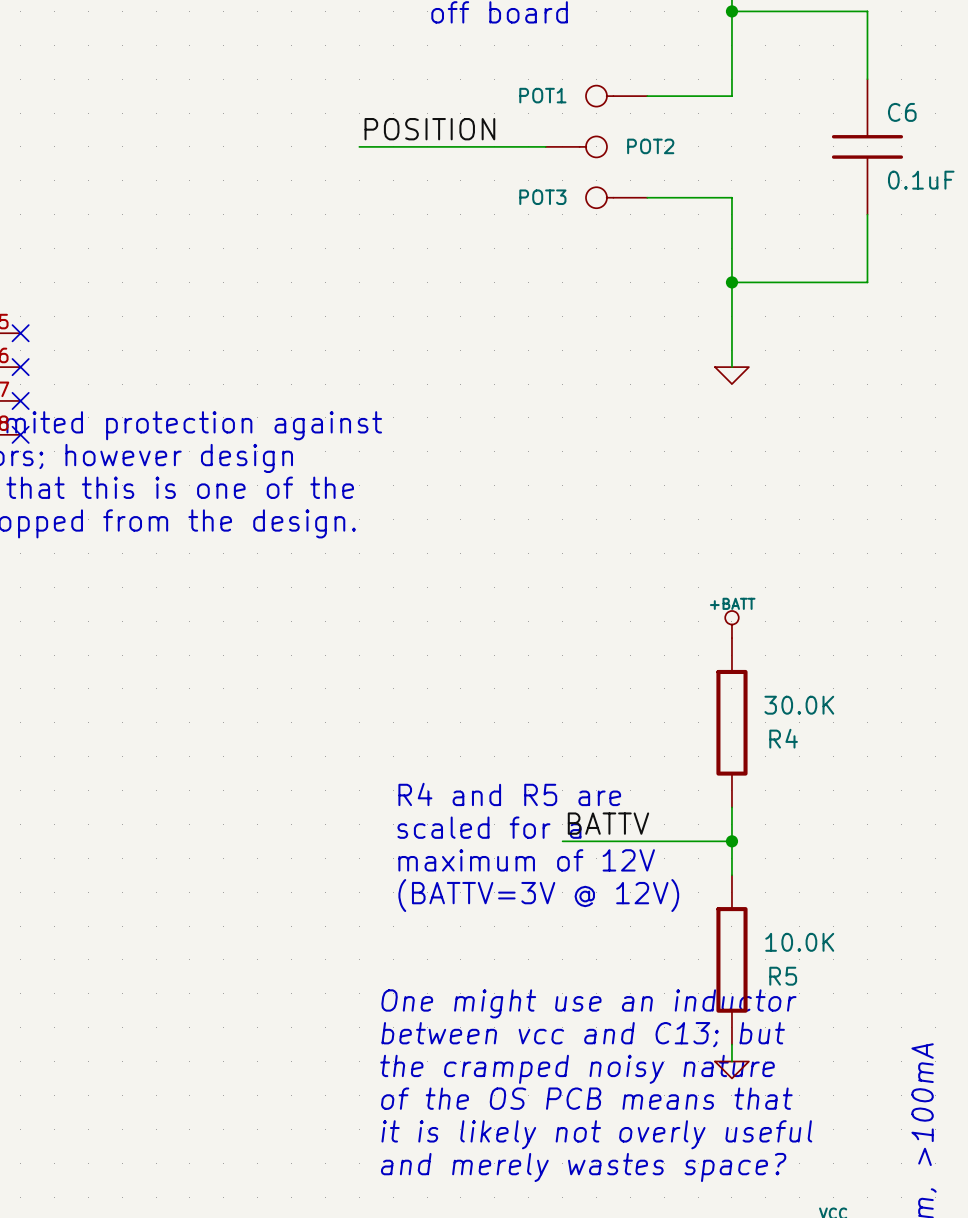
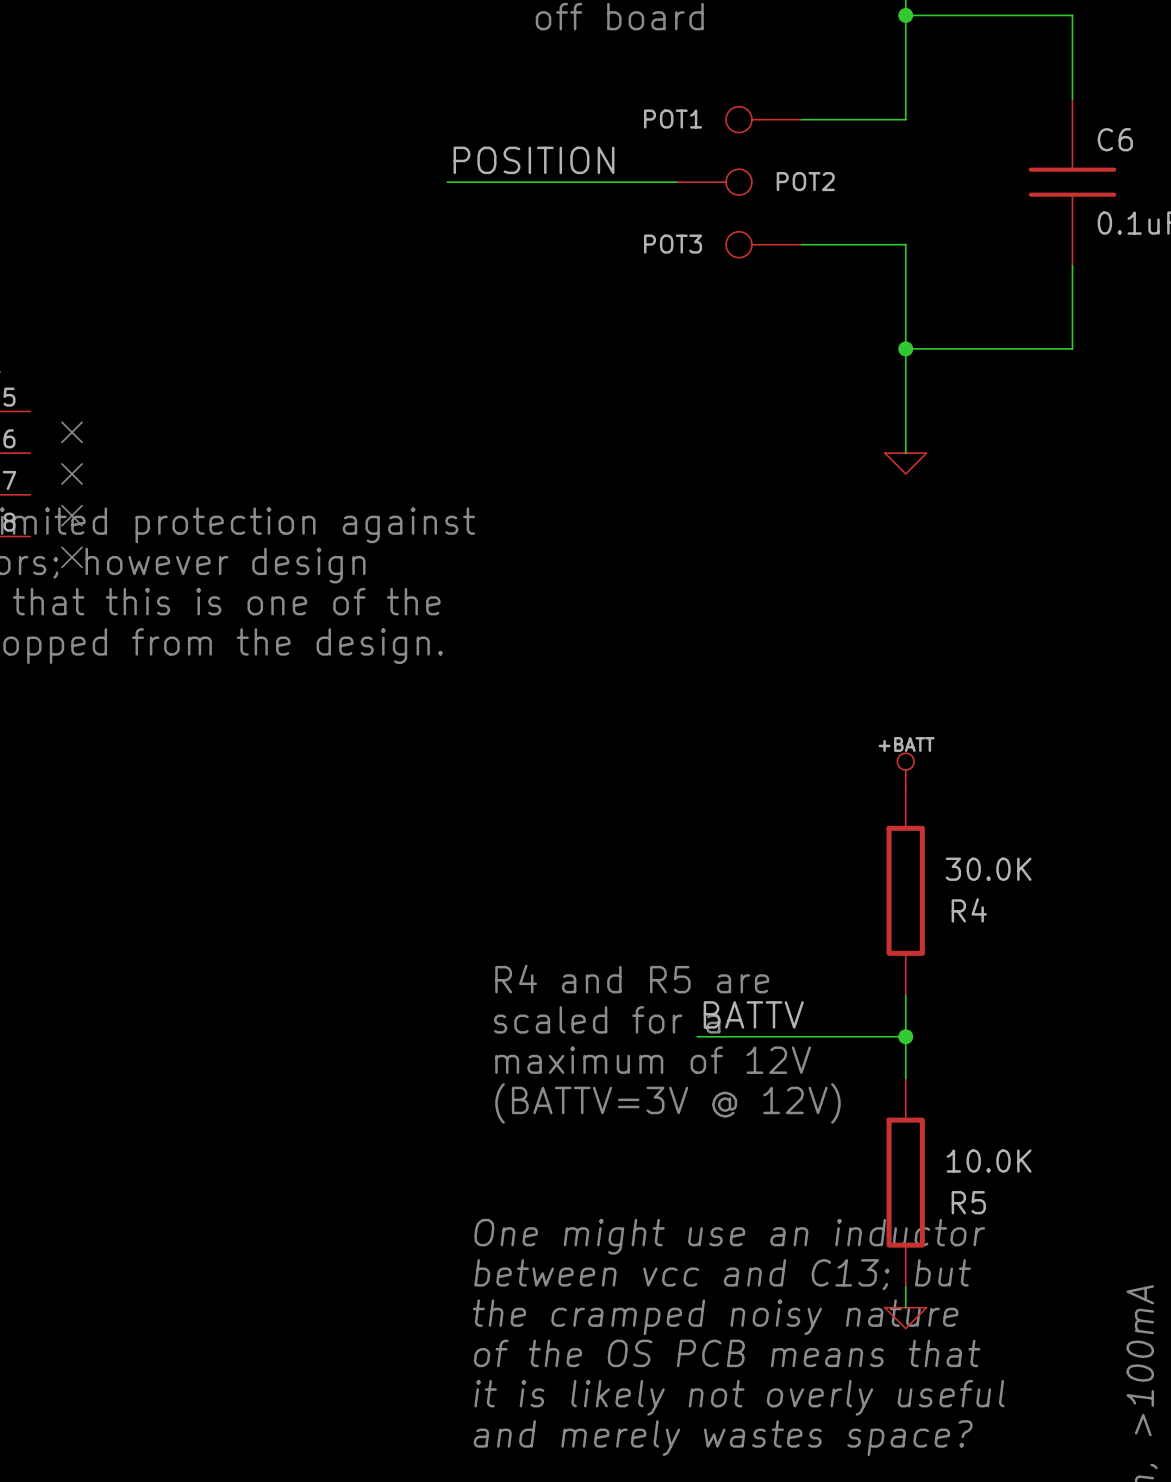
no-connect mark: (20, 333) -> none
no-connect mark: none -> (72, 432)
no-connect mark: (20, 367) -> none
no-connect mark: none -> (72, 473)
no-connect mark: (20, 400) -> none
no-connect mark: none -> (72, 515)
no-connect mark: (20, 434) -> none
no-connect mark: none -> (72, 557)

